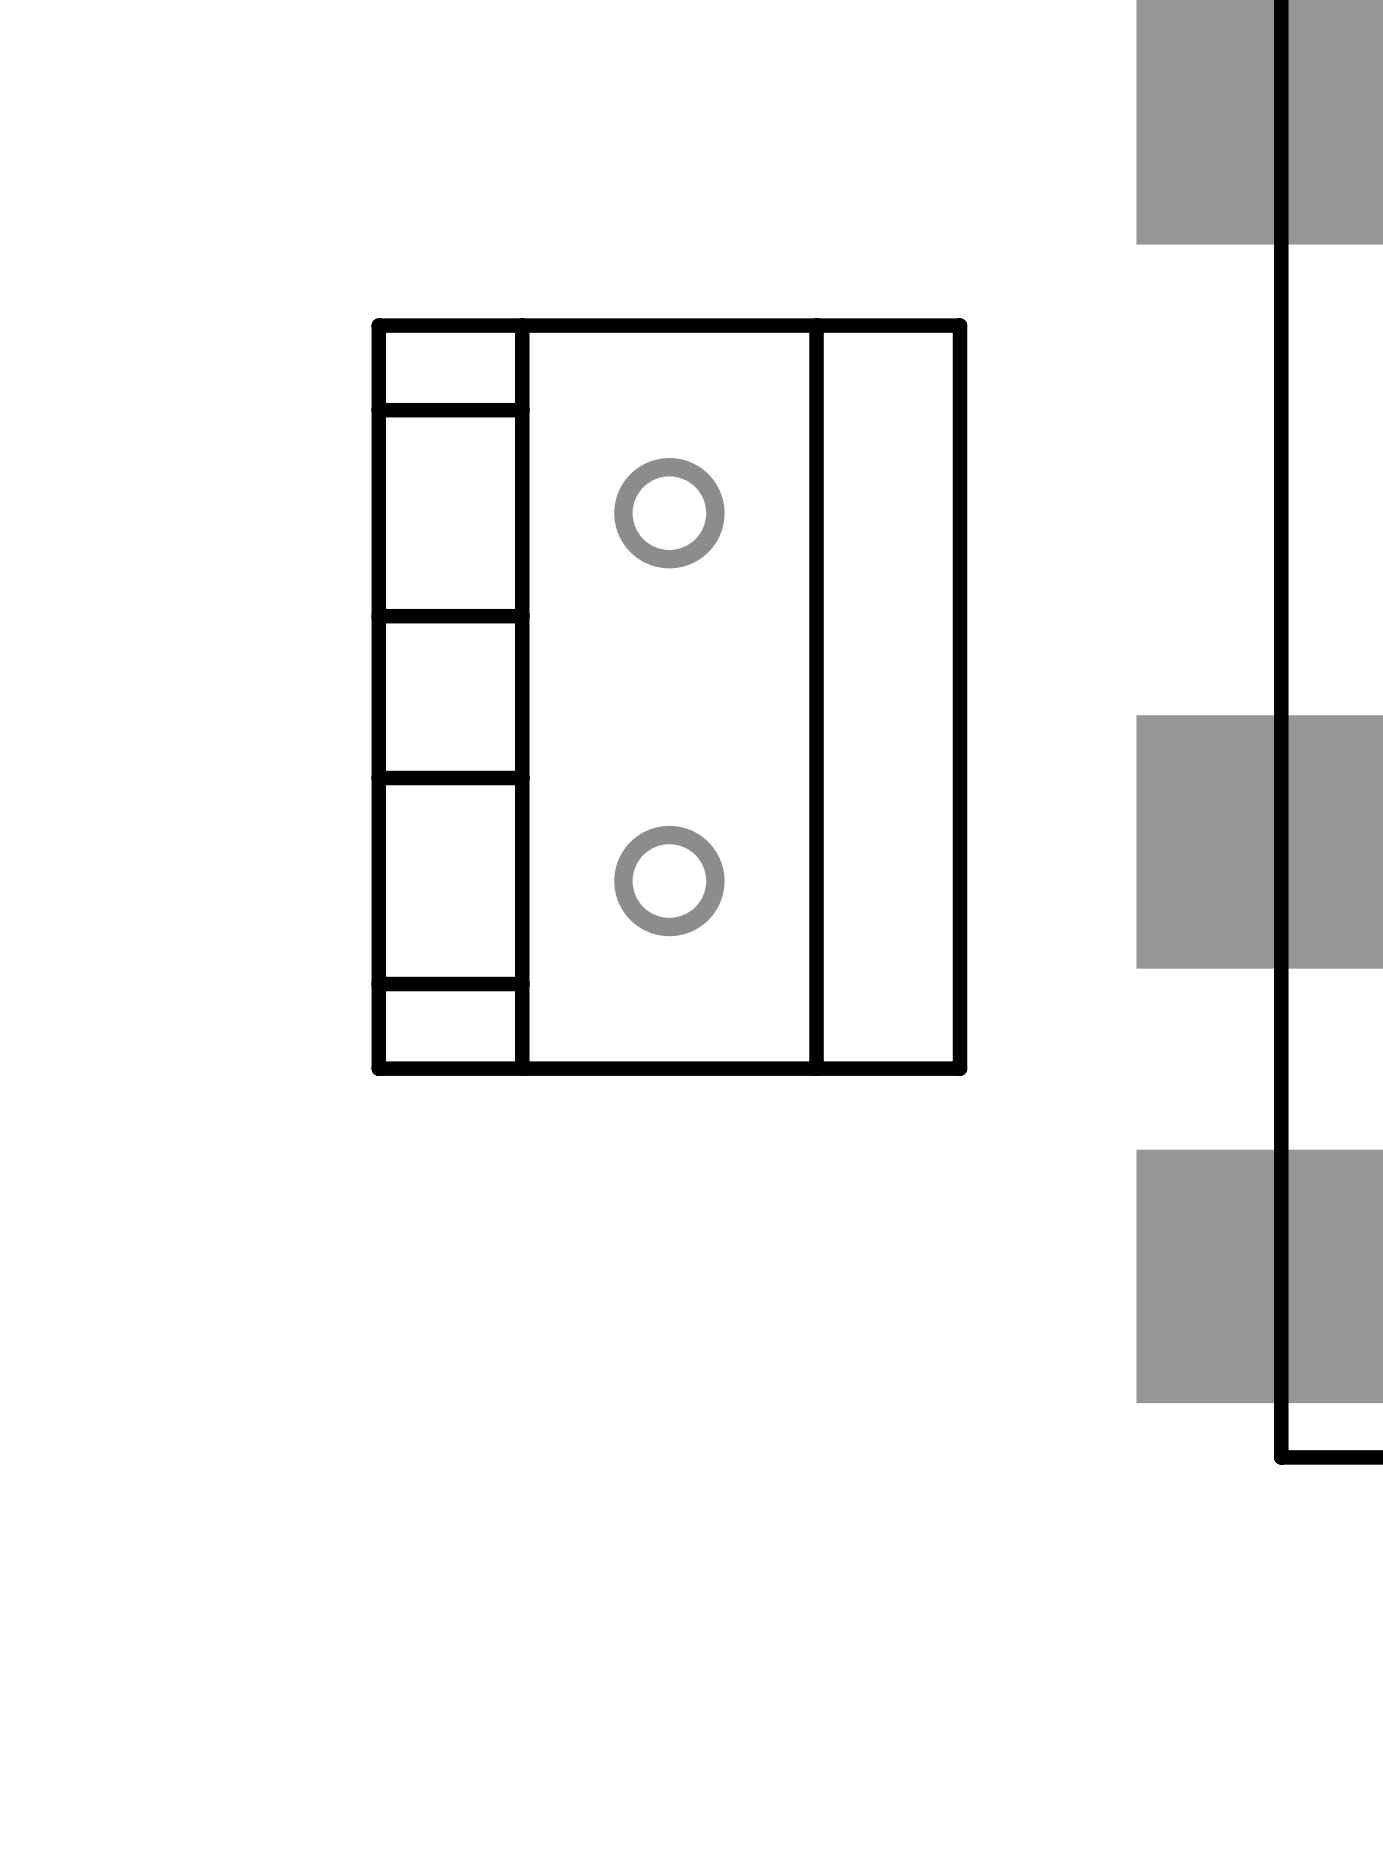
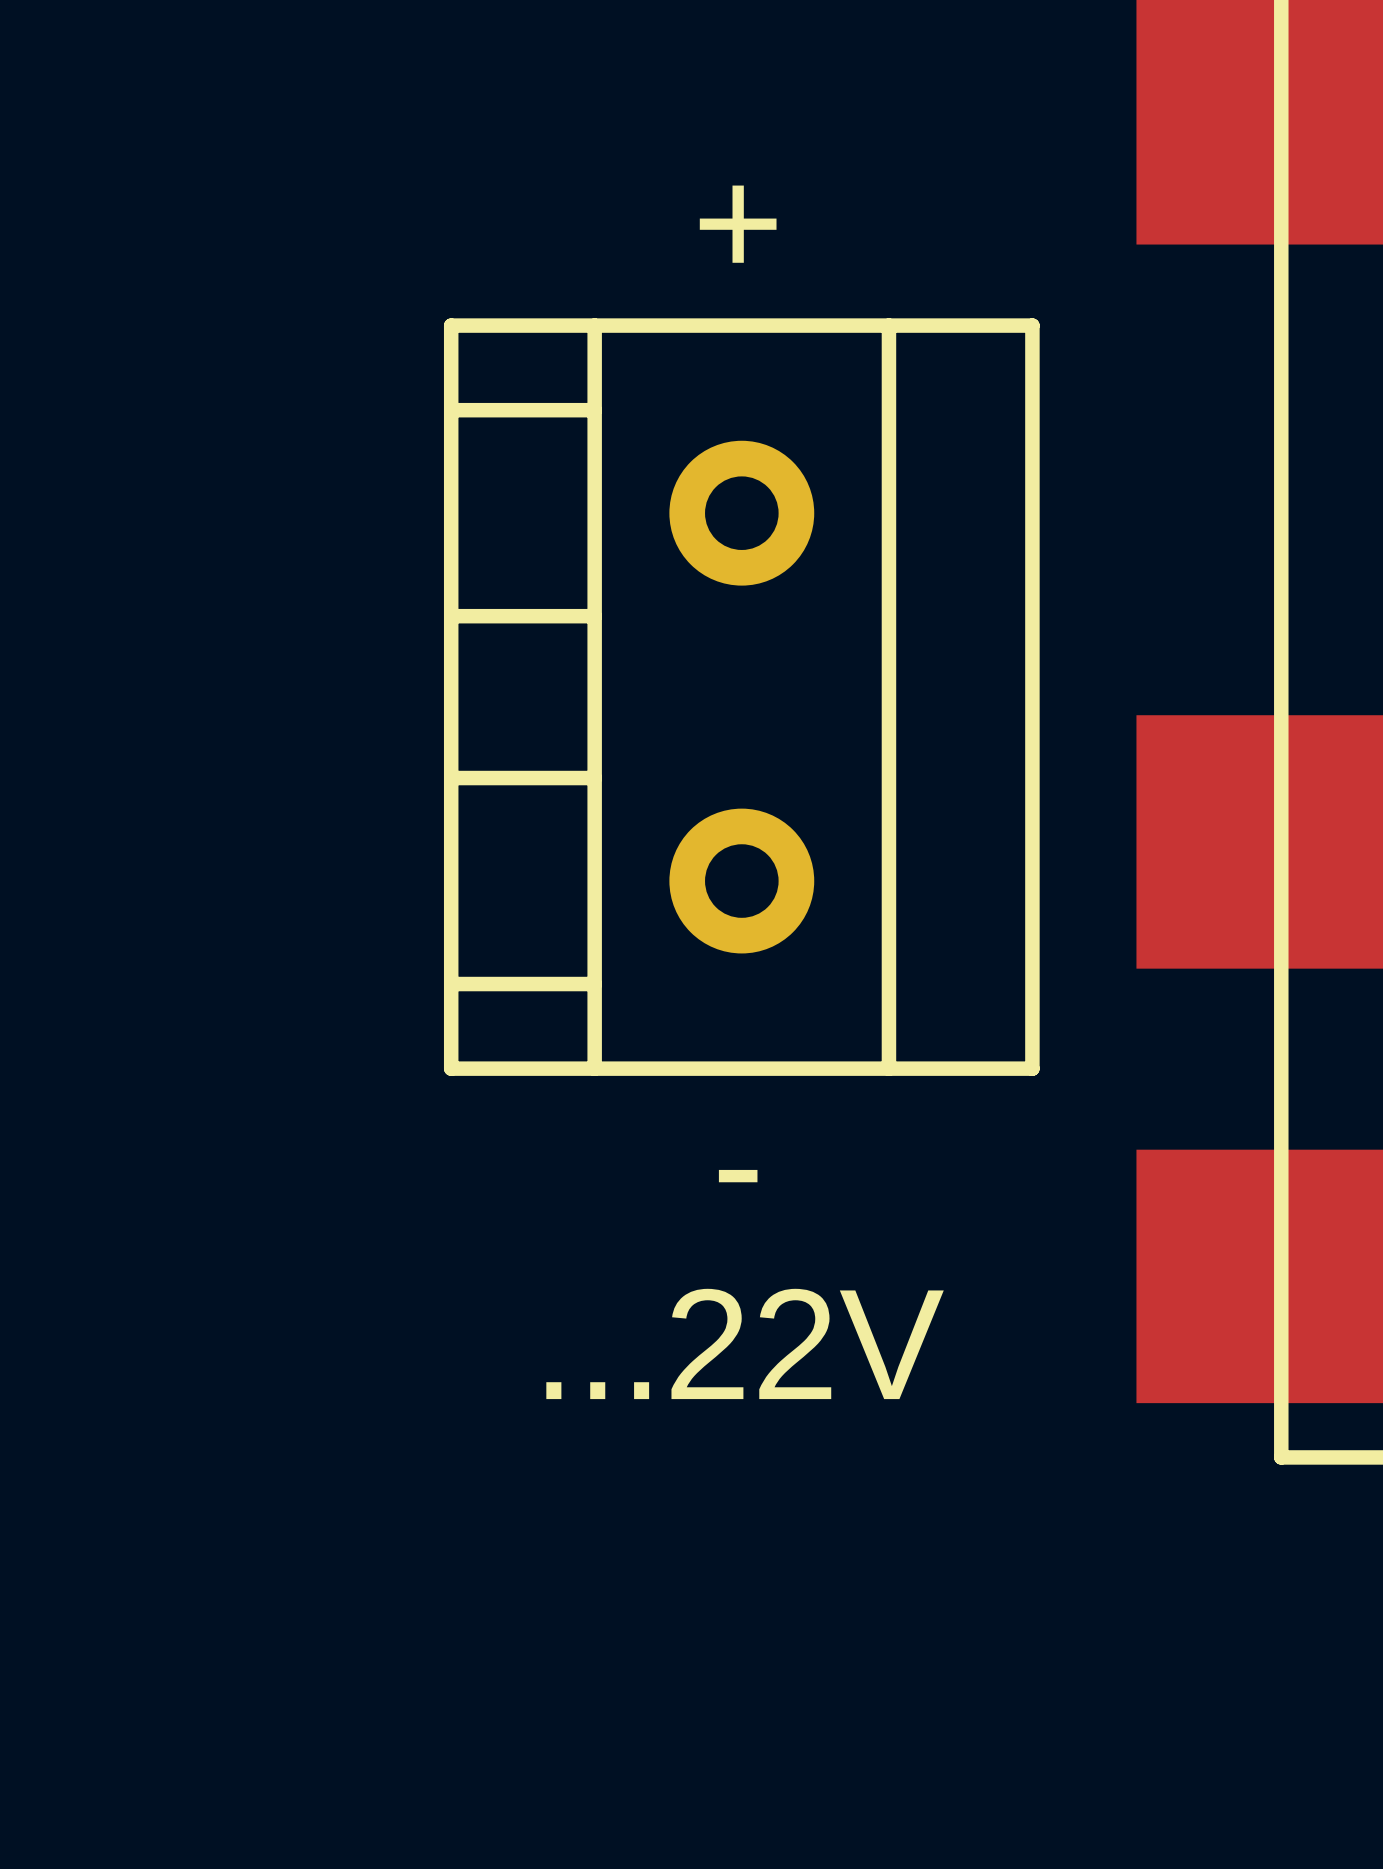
text: none -> + (738, 224)
part footprint: [371, 318, 968, 1076] -> [443, 318, 1040, 1076]
text: none -> - (738, 1176)
text: none -> ...22V (745, 1343)

